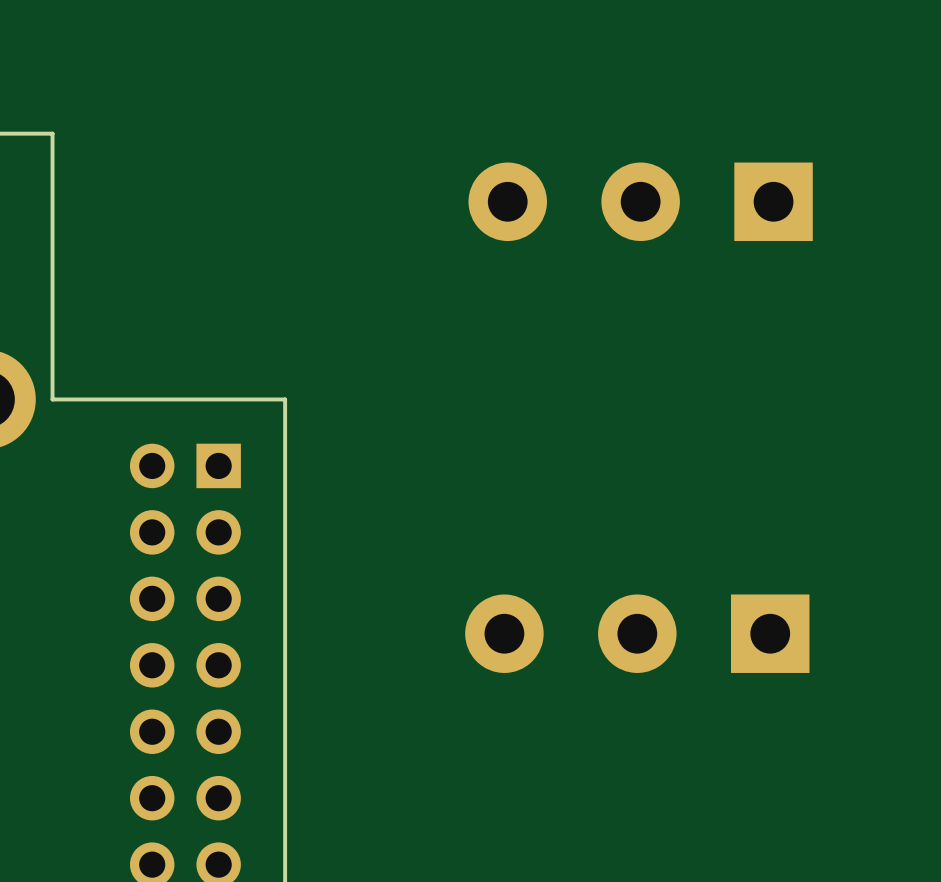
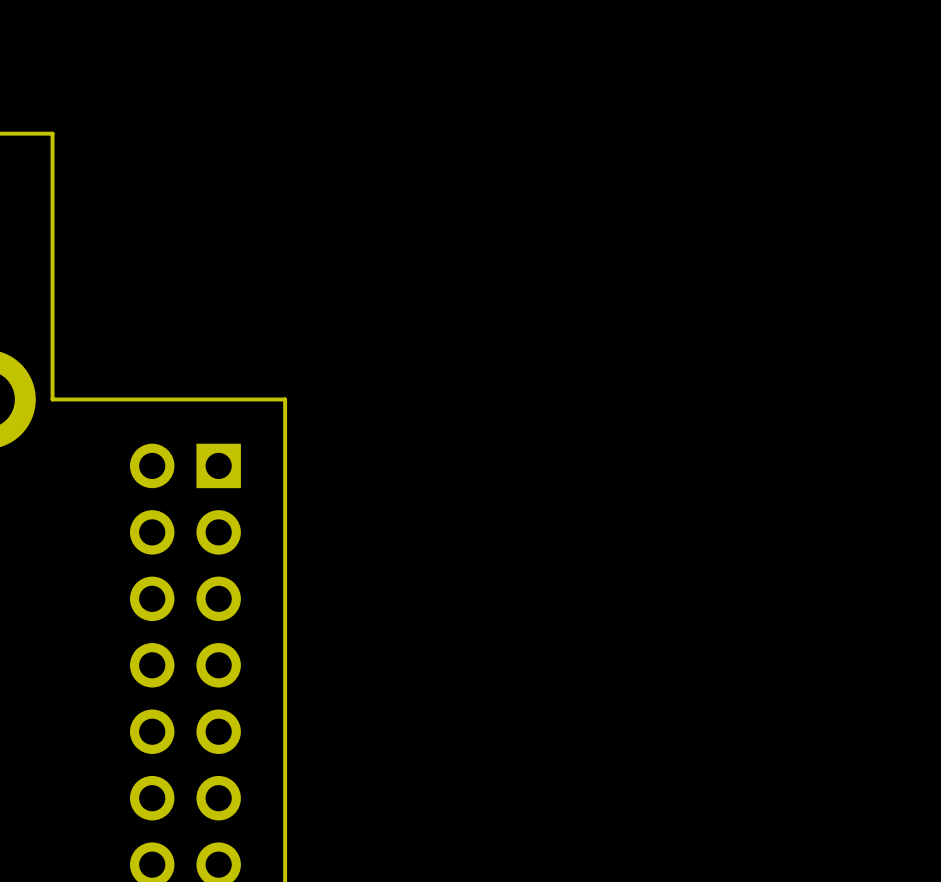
part: (640, 201) -> none
part: (637, 633) -> none

